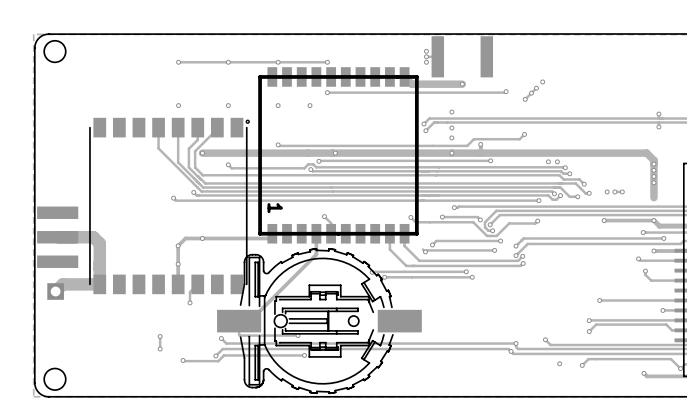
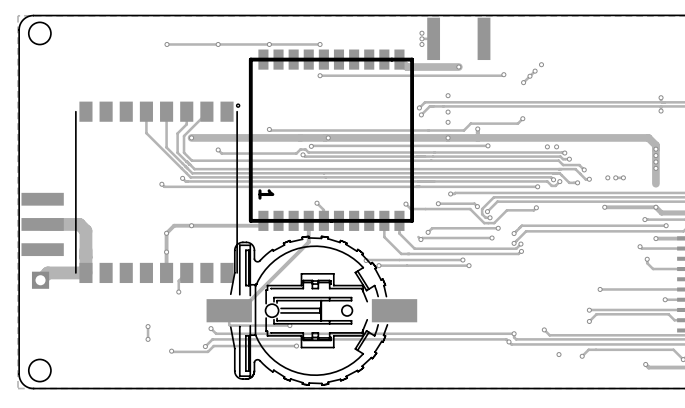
via: (178, 105) -> none
via: (228, 105) -> none
via: (278, 105) -> none
via: (309, 105) -> none

